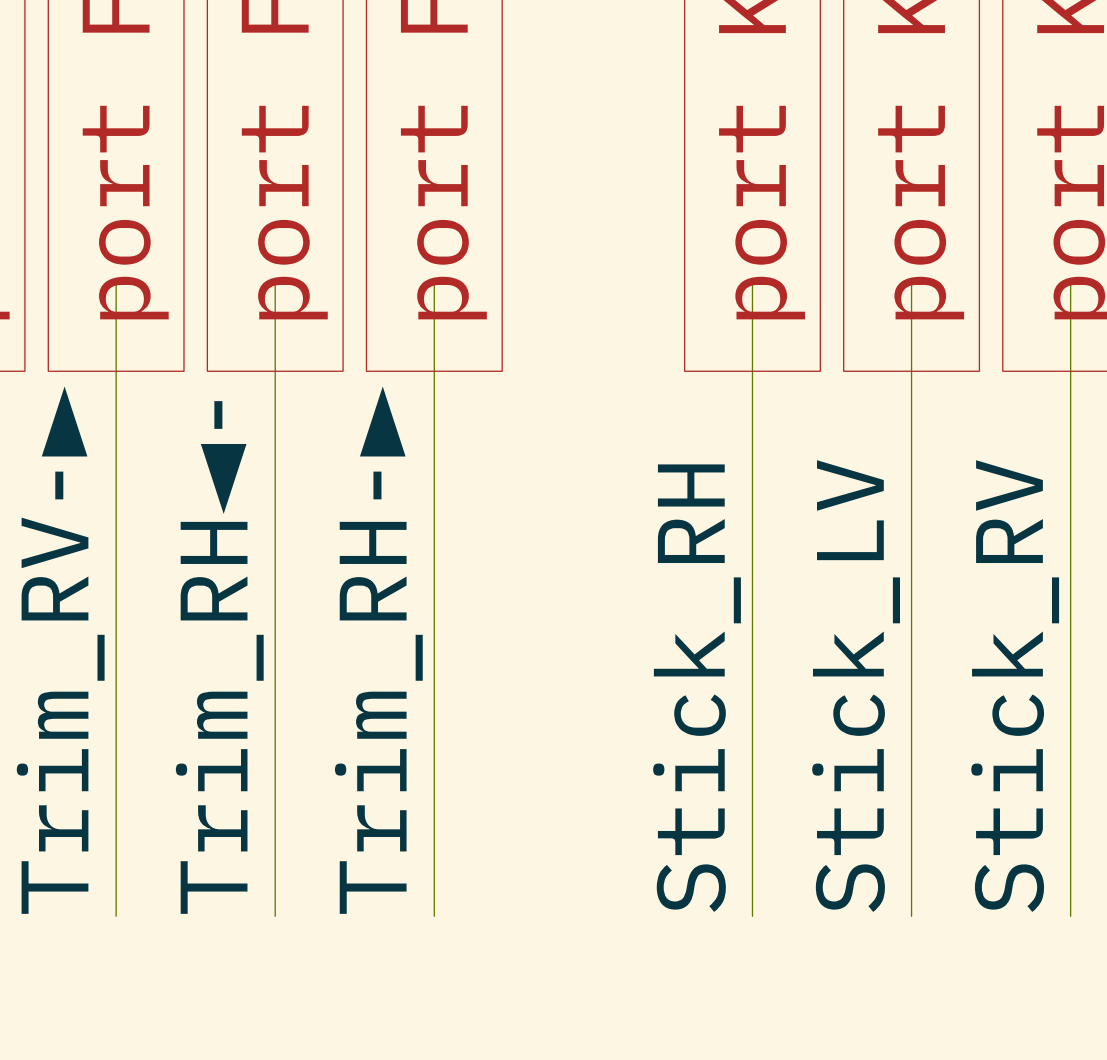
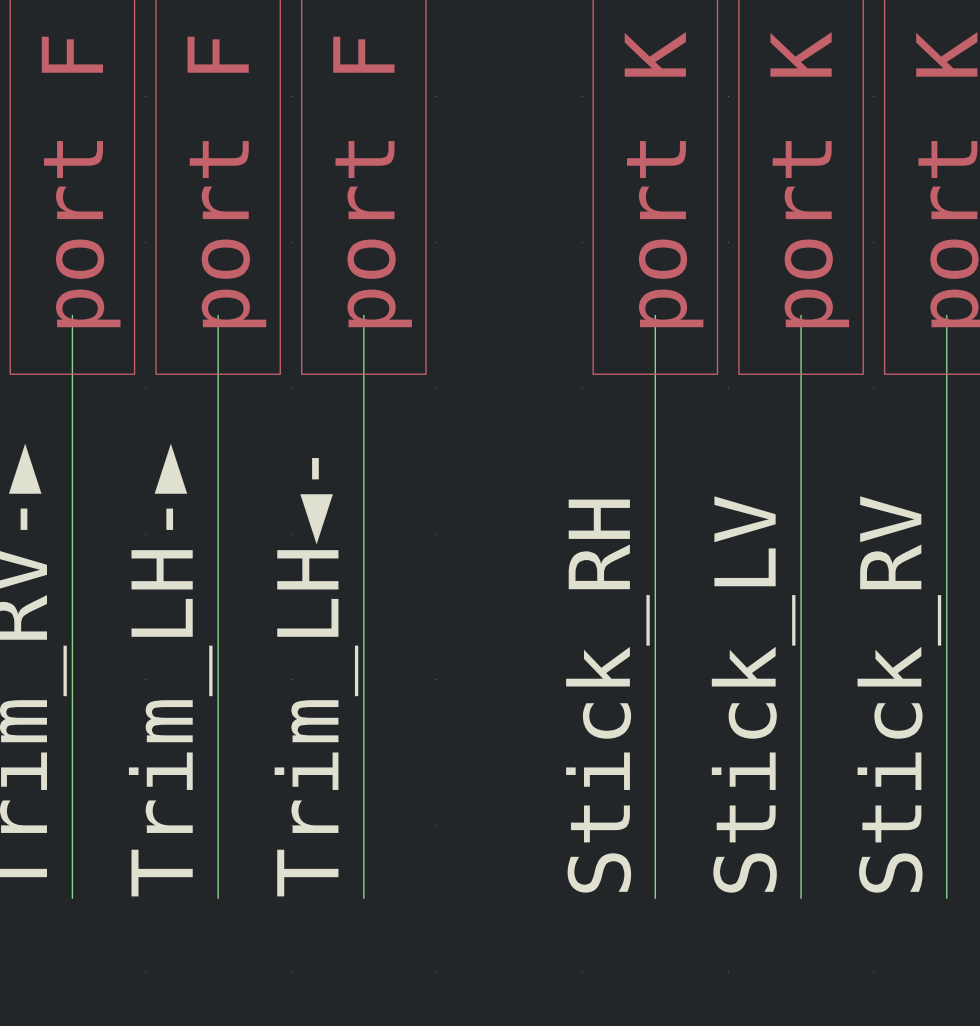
label: Trim_RH-► (378, 650) -> Trim_LH◄- (316, 677)
label: Trim_RH◄- (219, 657) -> Trim_LH-► (170, 670)

